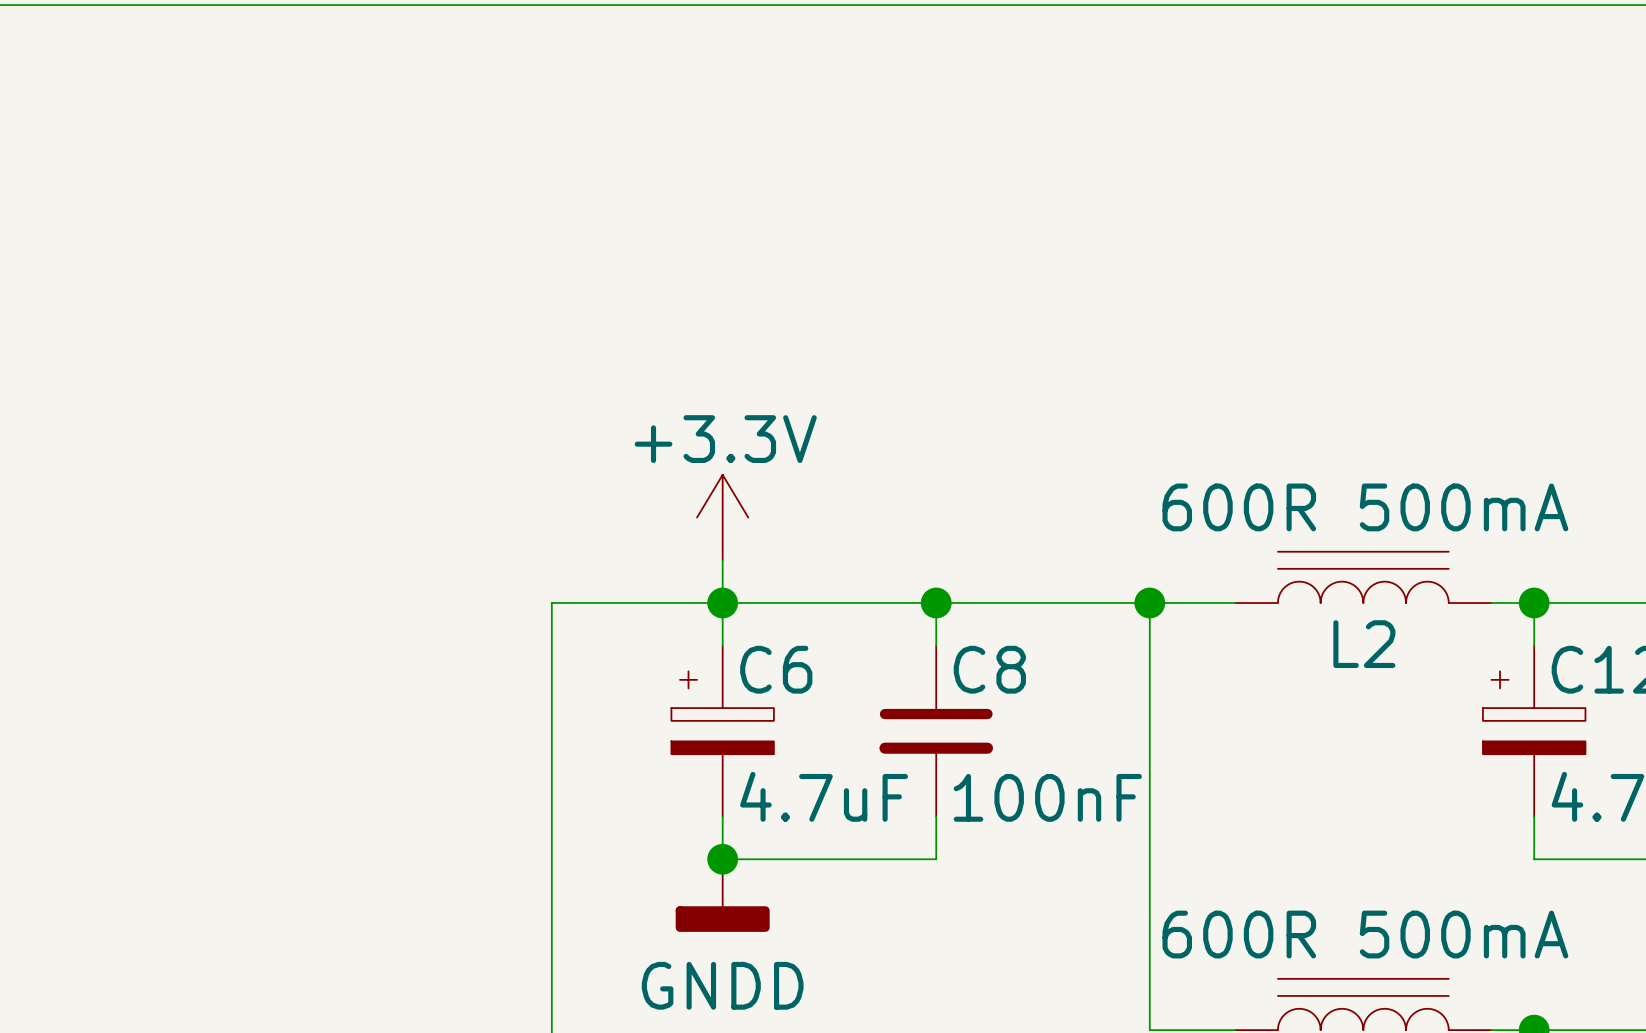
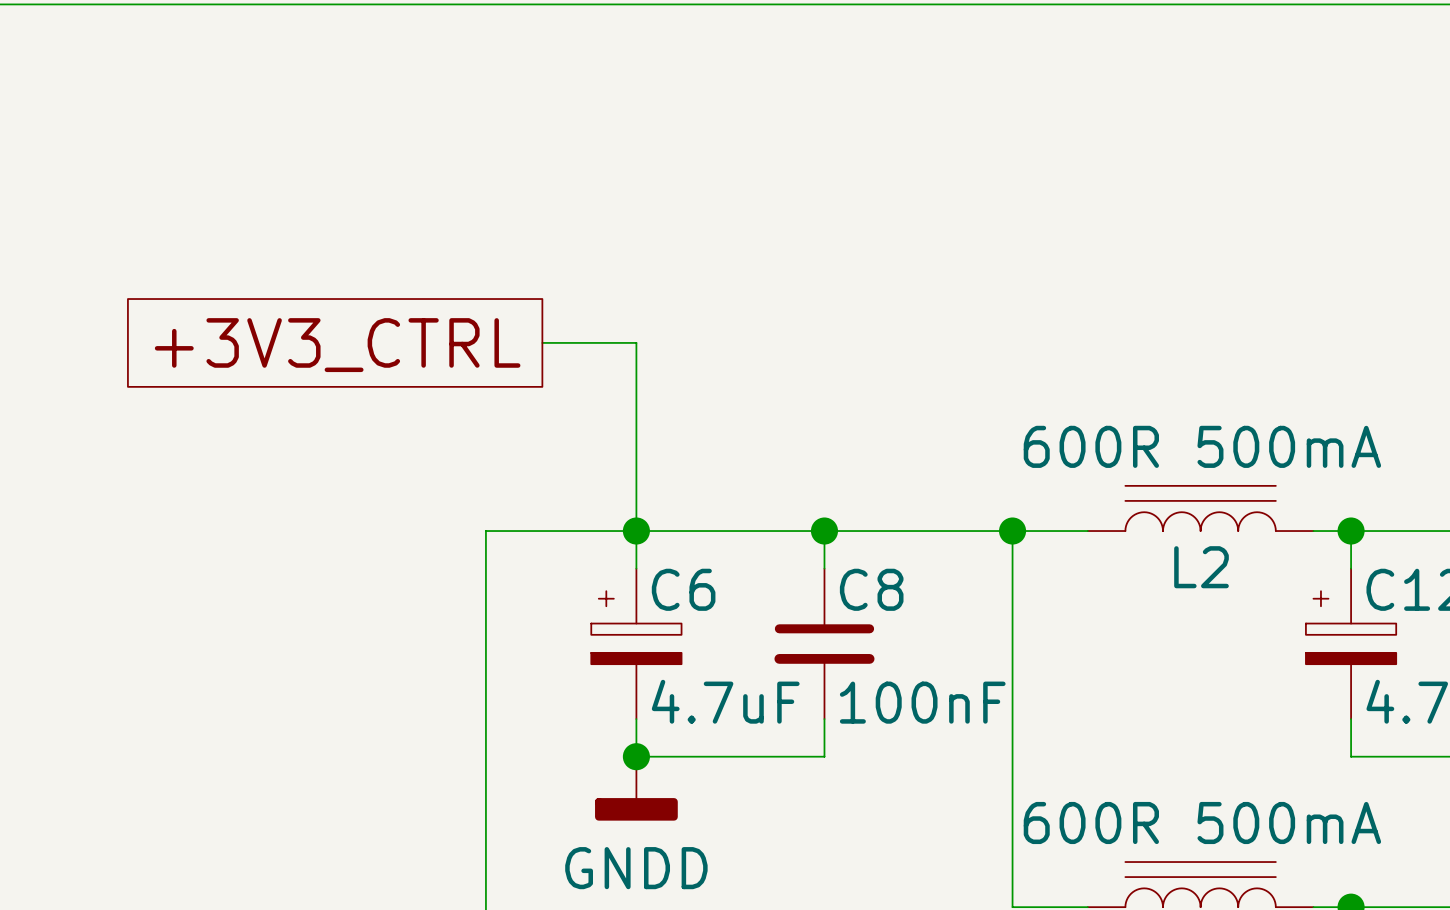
wire: none -> (542, 342) (636, 342) (636, 493)
global label: none -> +3V3_CTRL (337, 345)
power symbol: +3.3V (722, 517) -> none

